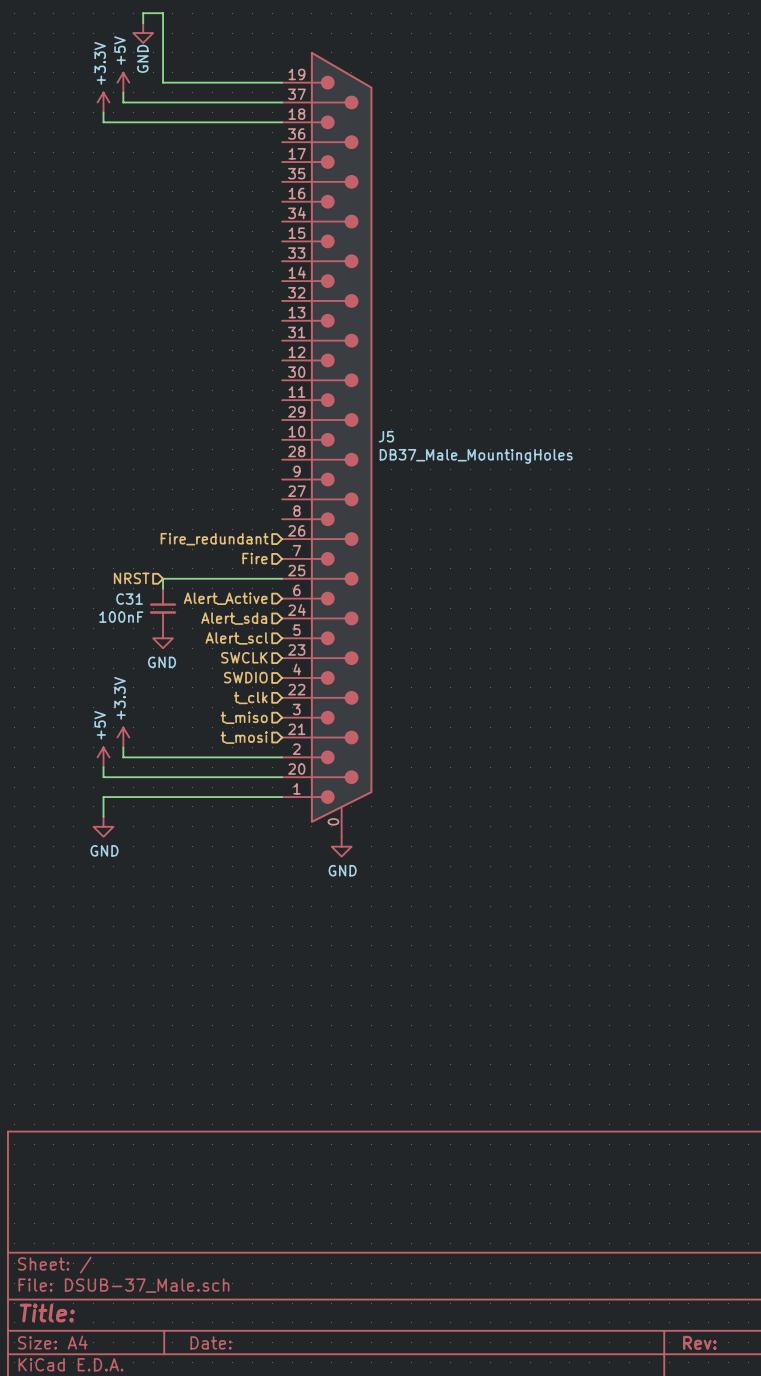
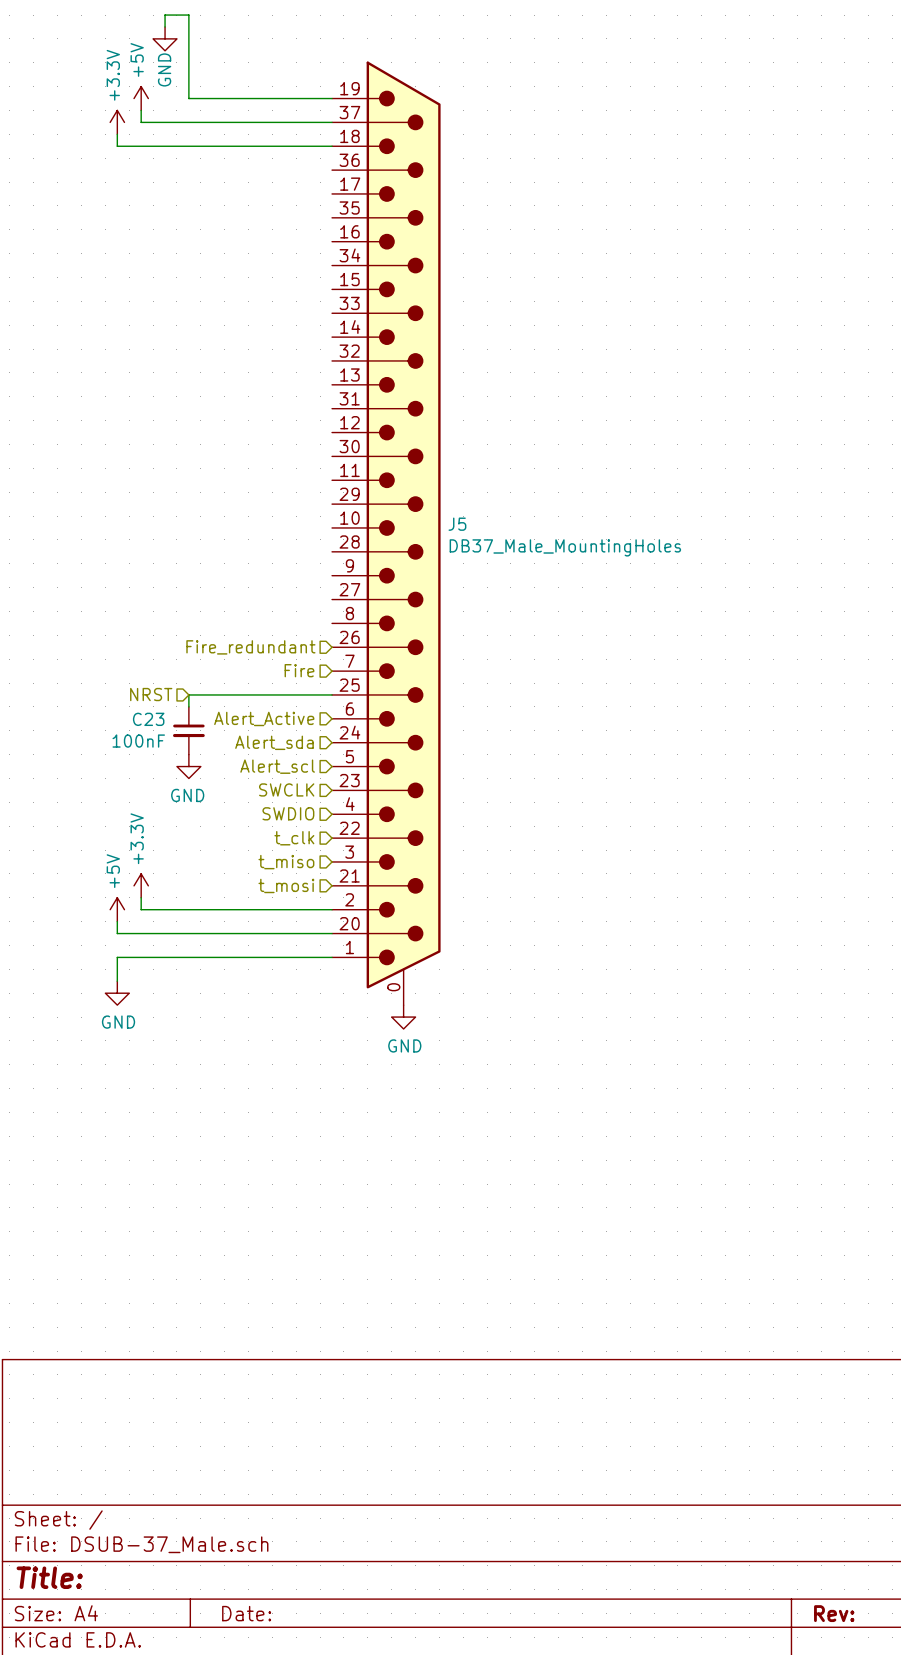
C31 name: C31 (129, 599) -> C23 (148, 719)

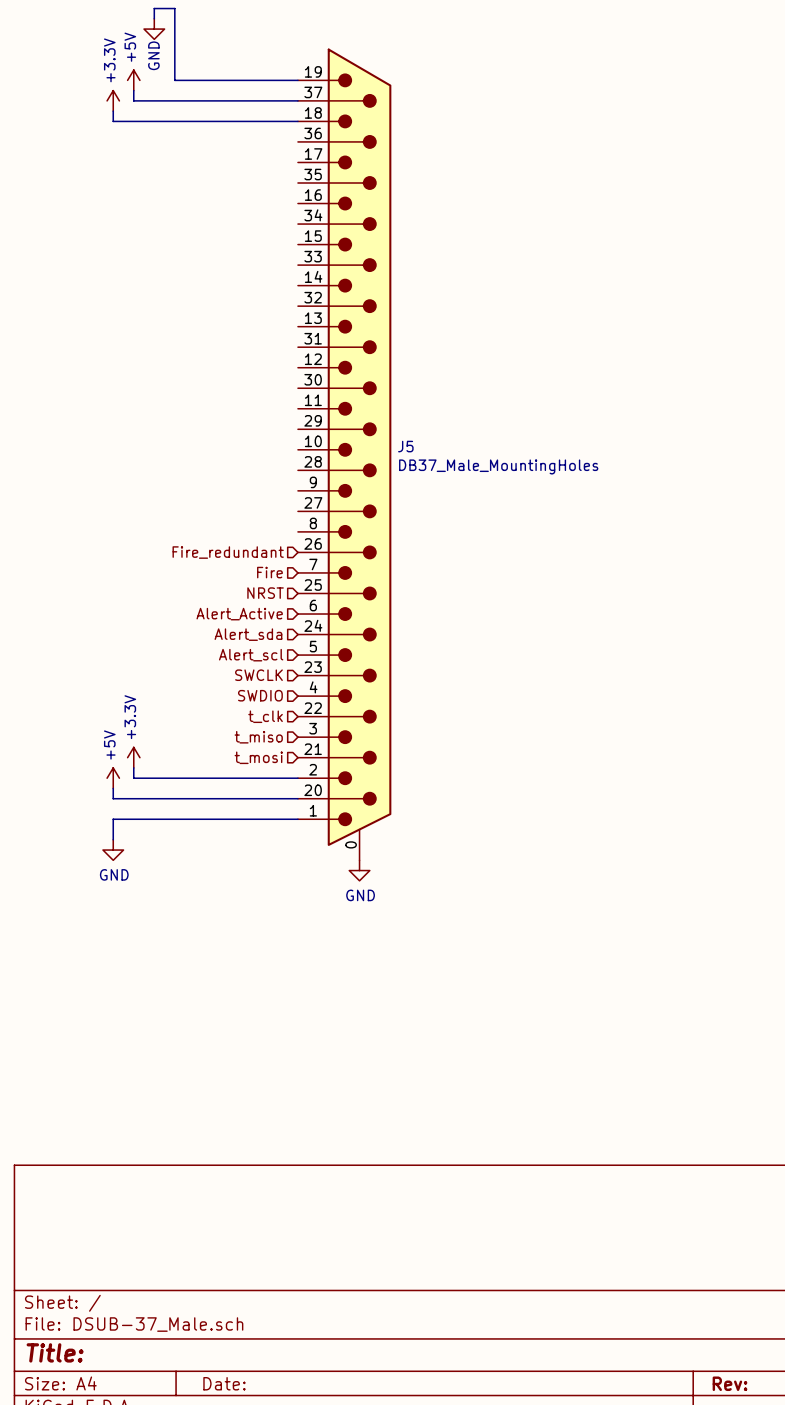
hierarchical label position: NRST (151, 694) -> NRST (265, 593)
wire: (332, 694) (188, 694) (188, 706) -> none
C23: 100nF (188, 730) -> none
power symbol: GND (188, 766) -> none

